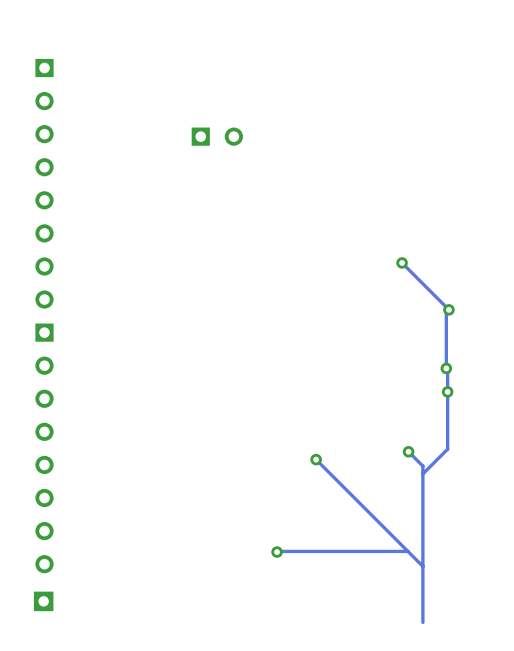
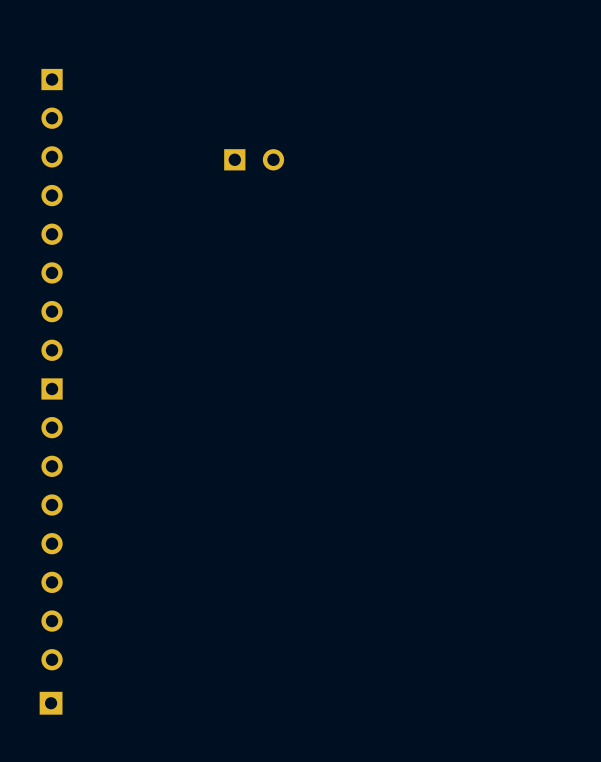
track: (402, 262) (448, 309) (446, 312) (447, 449) (422, 473) -> none
via: (402, 262) -> none
via: (448, 309) -> none
via: (446, 368) -> none
via: (447, 391) -> none
track: (408, 451) (422, 466) (422, 622) -> none
via: (408, 451) -> none
track: (316, 459) (422, 566) -> none
via: (316, 459) -> none
track: (407, 551) (277, 552) -> none
via: (277, 552) -> none

